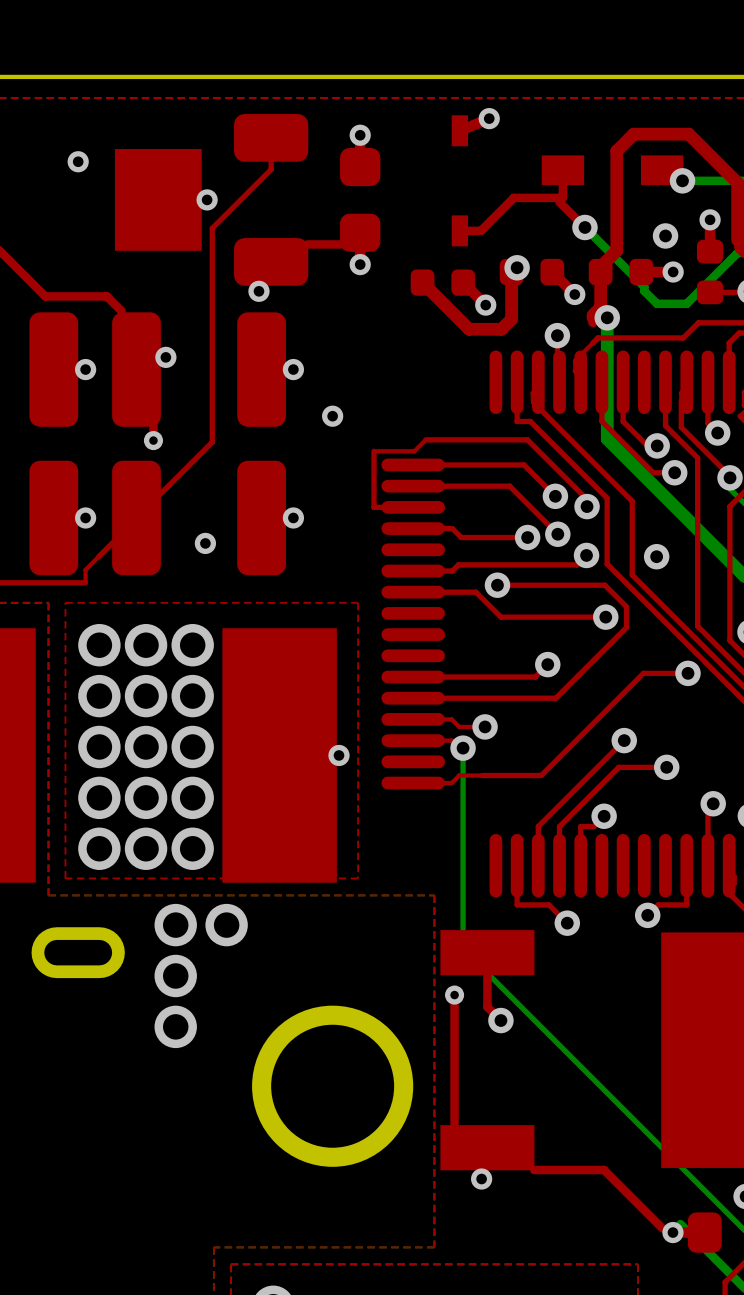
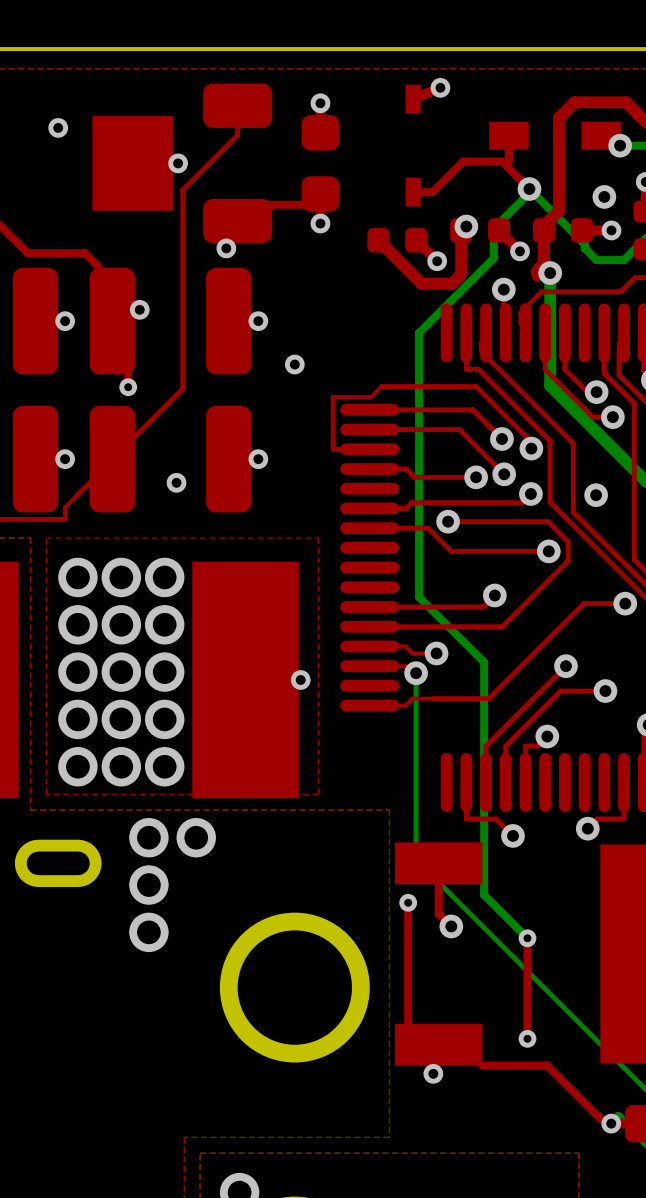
bottom track: none -> (523, 198) (493, 228) (493, 258) (419, 332) (419, 597) (484, 662) (484, 894) (527, 938)
top track: none -> (527, 938) (527, 1038)
via: none -> (527, 938)
via: none -> (527, 1038)

